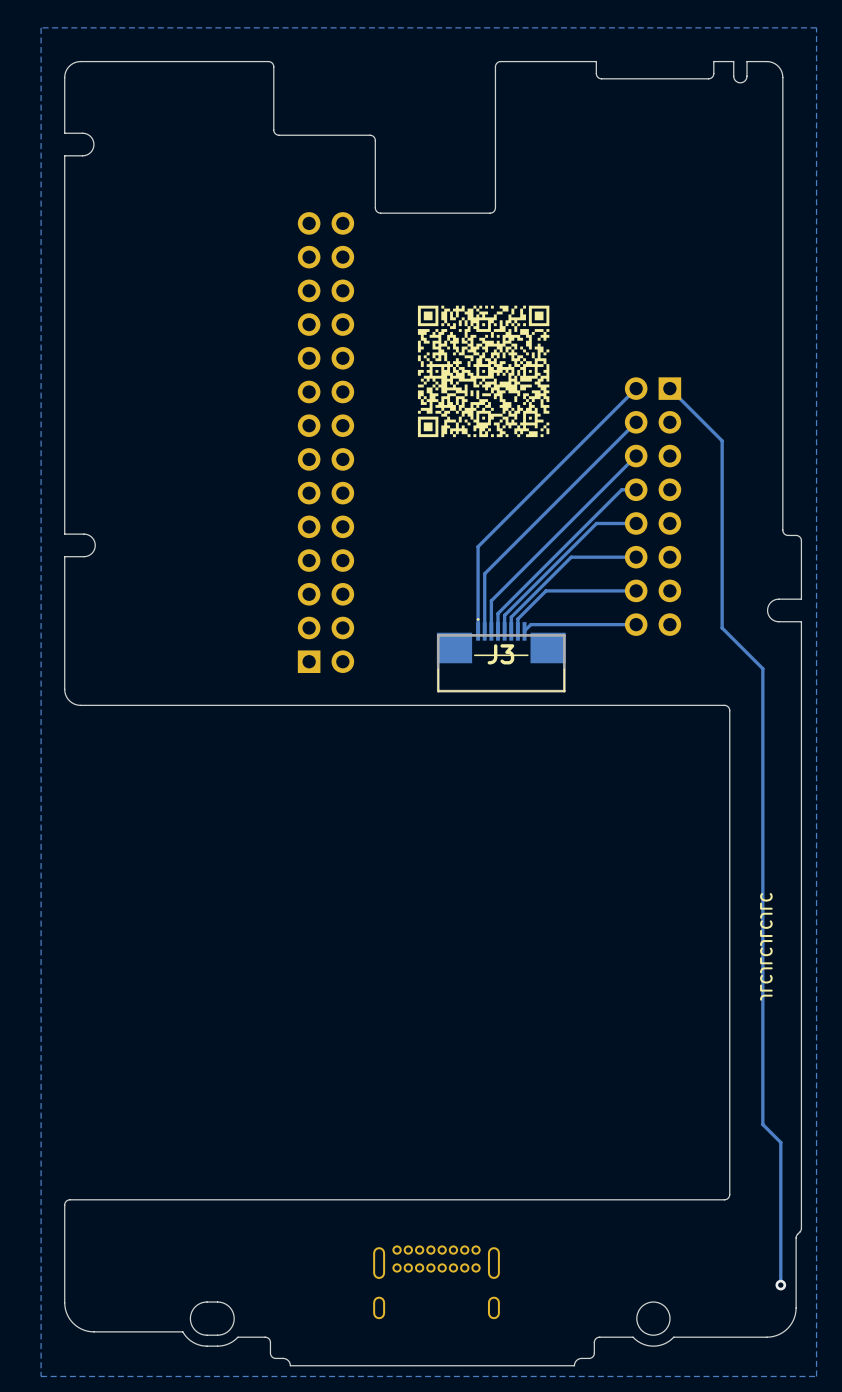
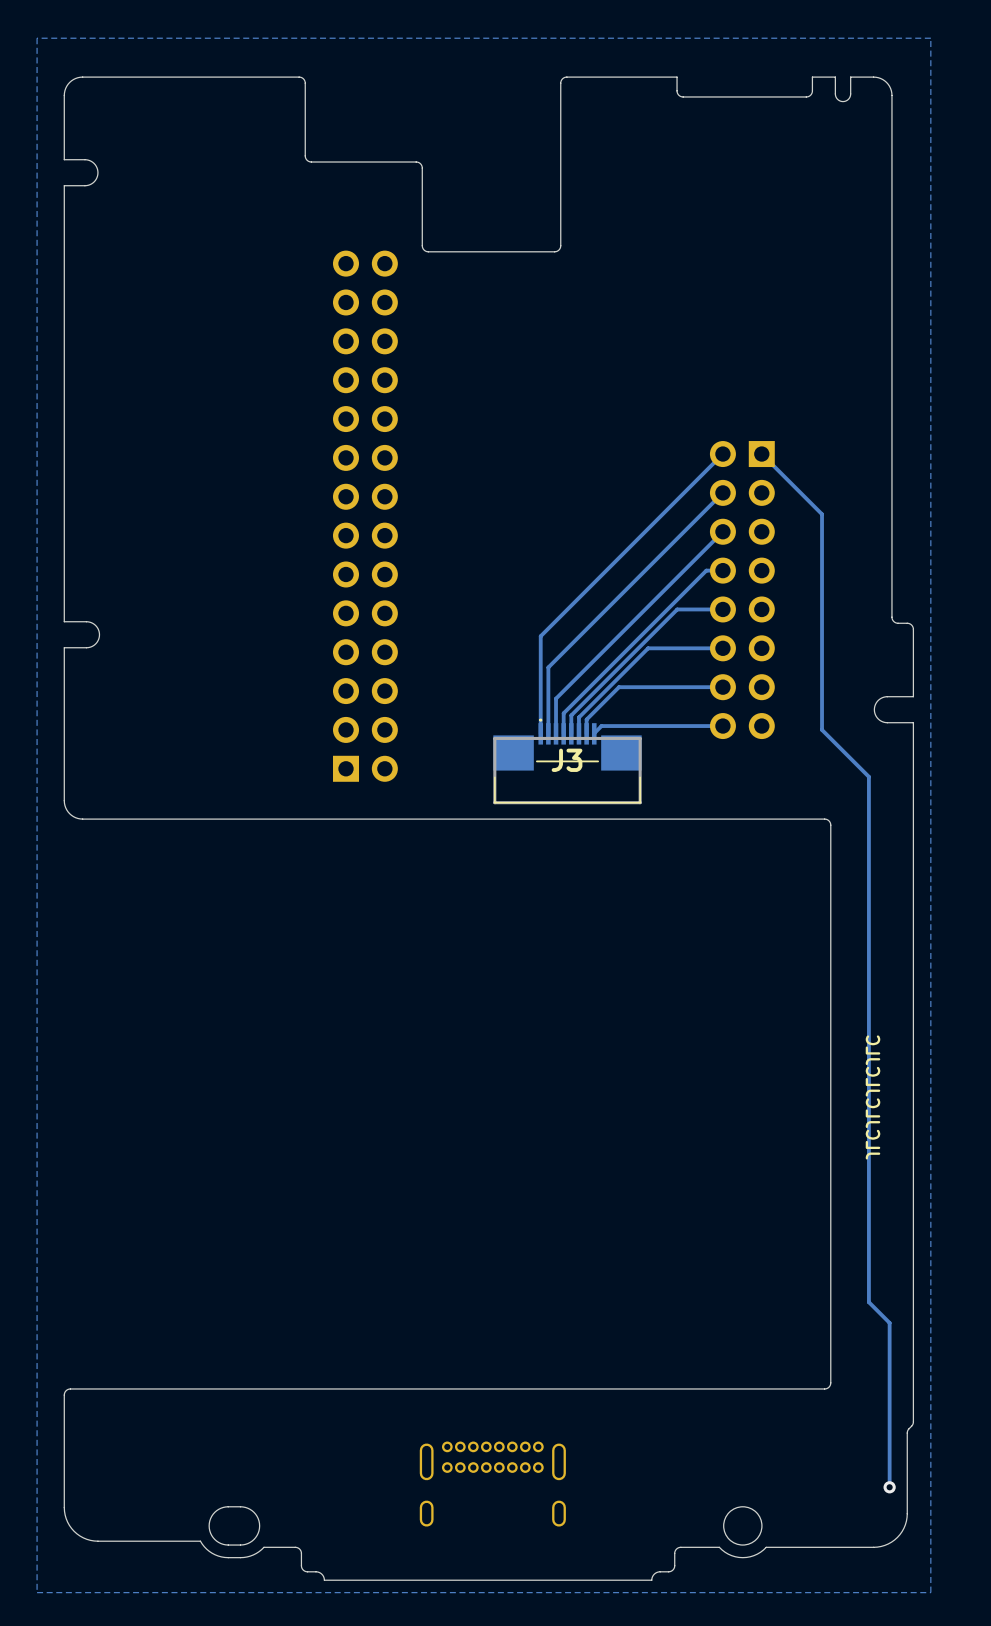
drawing: [417, 305, 550, 438] -> none

